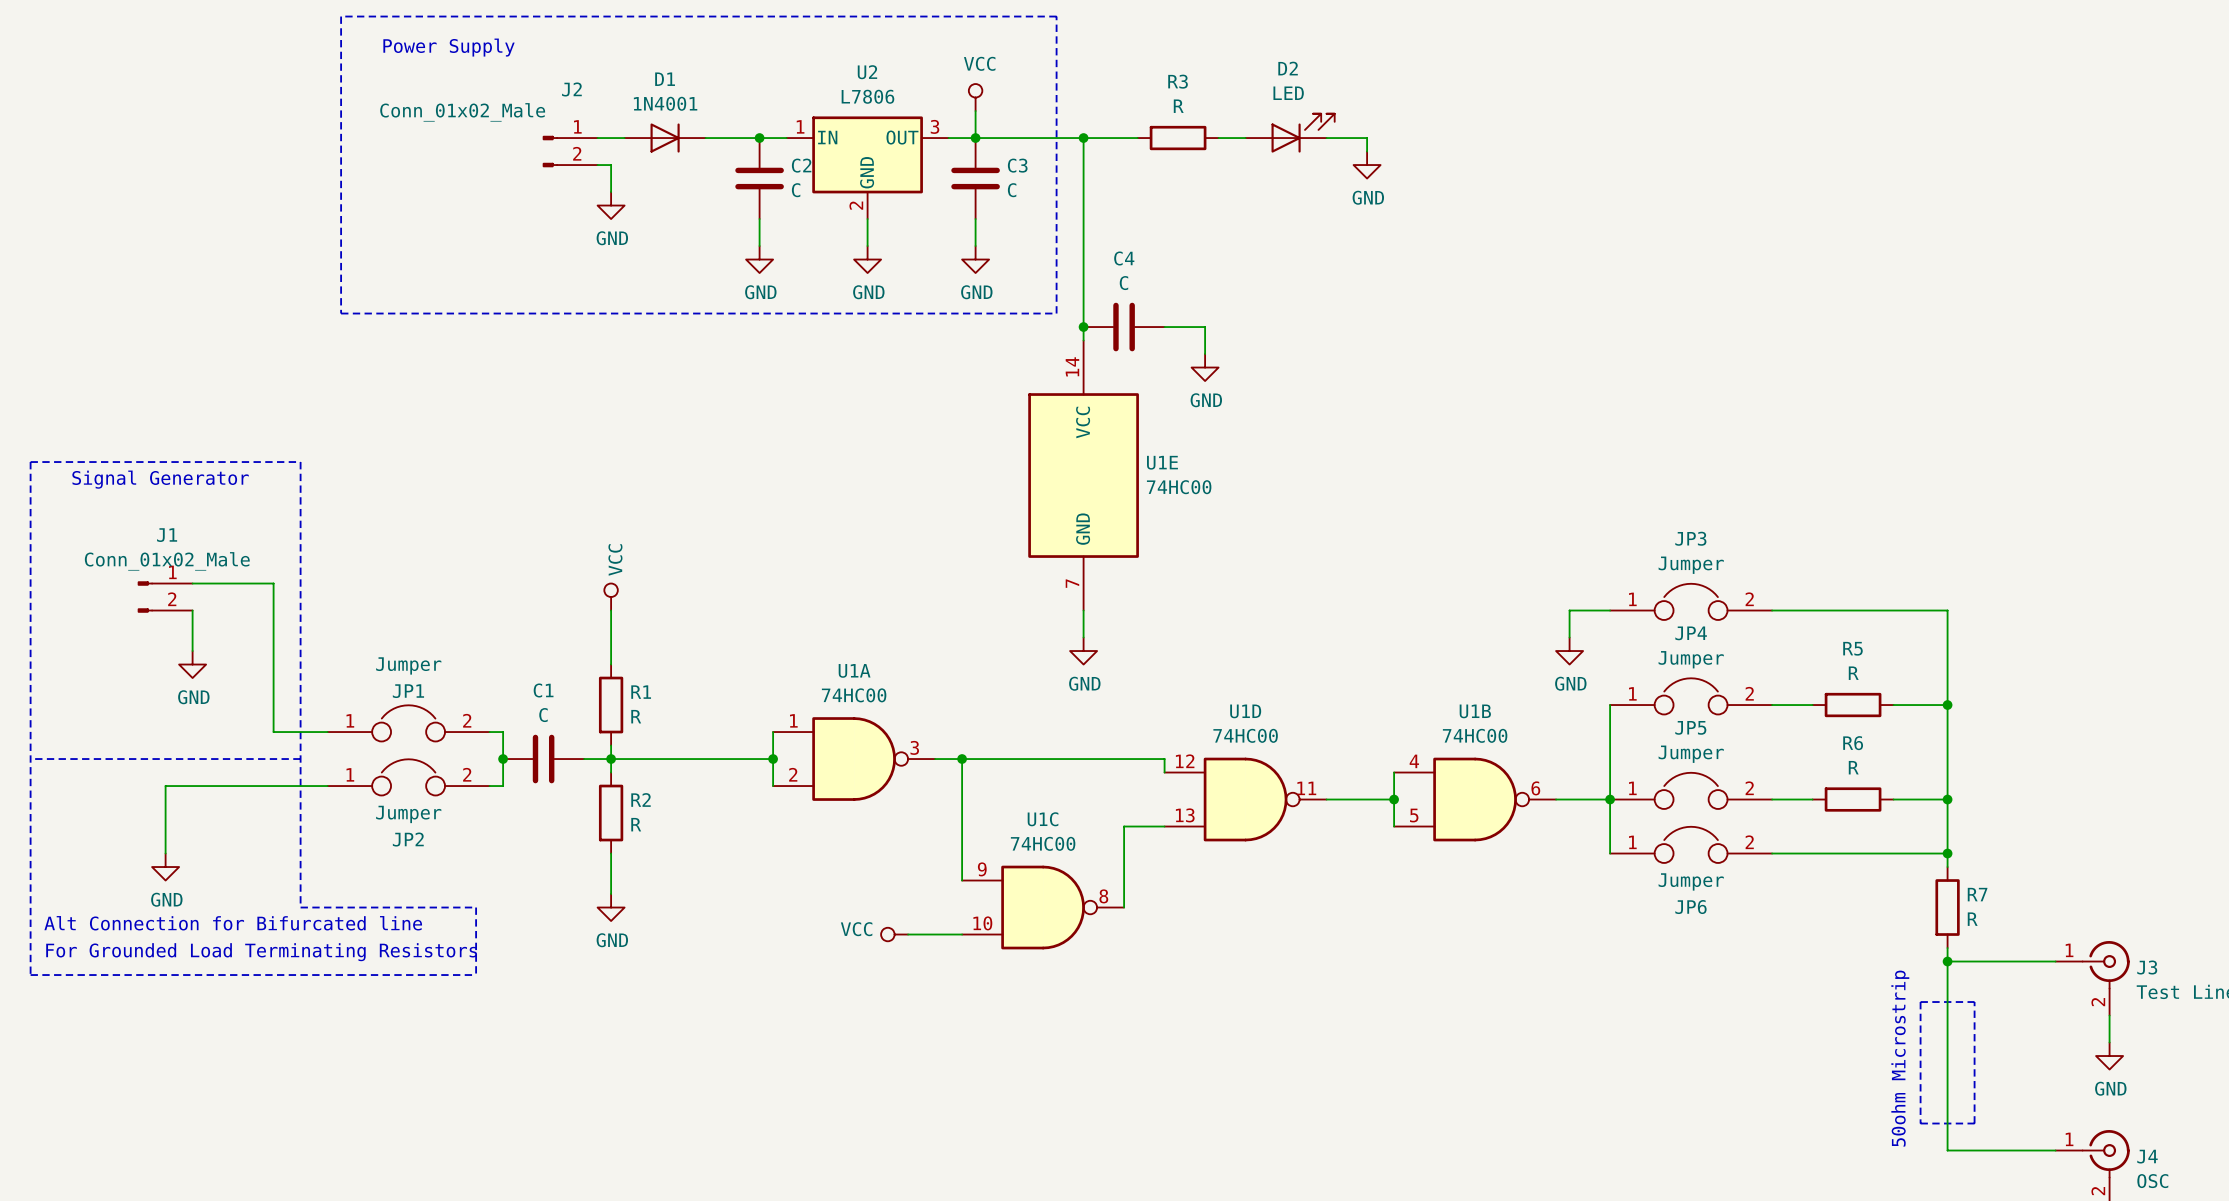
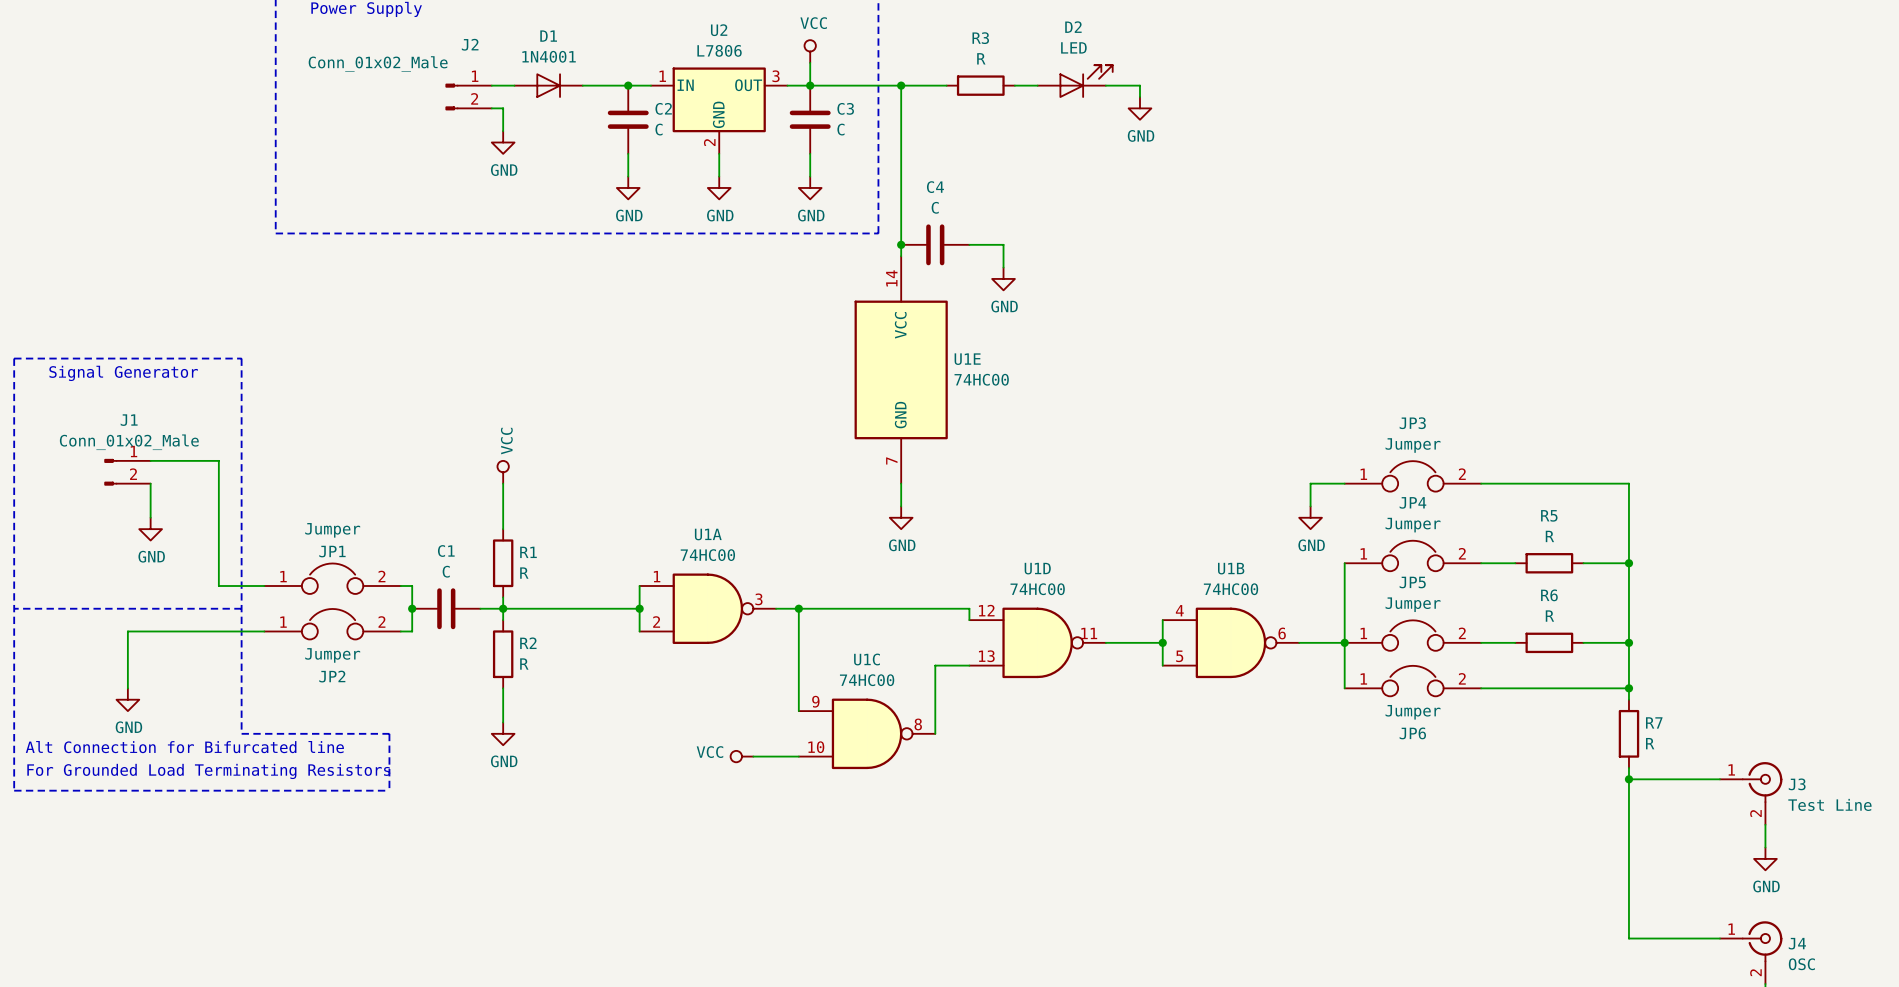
line: (1920, 1002) (1920, 1123) (1974, 1123) (1974, 1002) (1920, 1002) -> none
text: 50ohm Microstrip (1900, 1058) -> none

